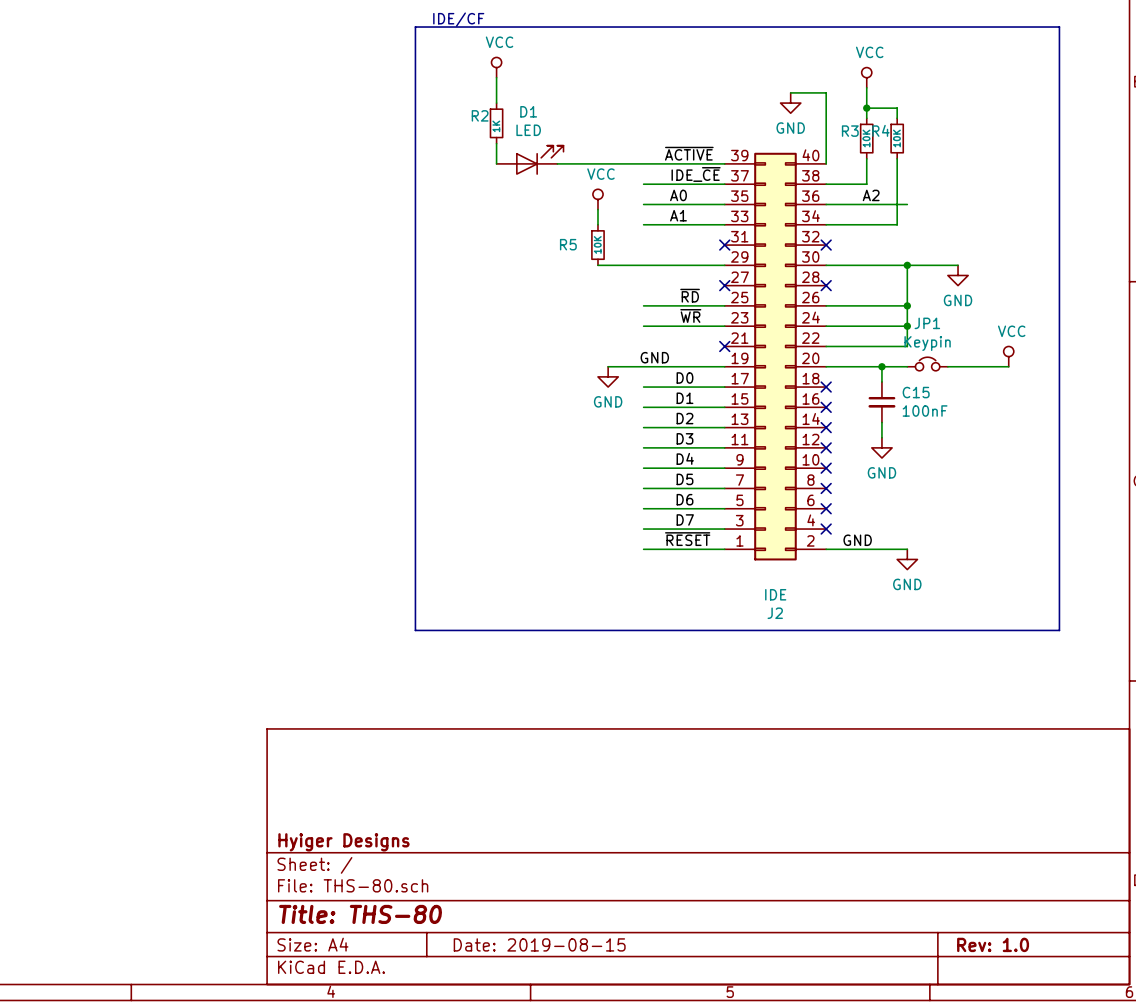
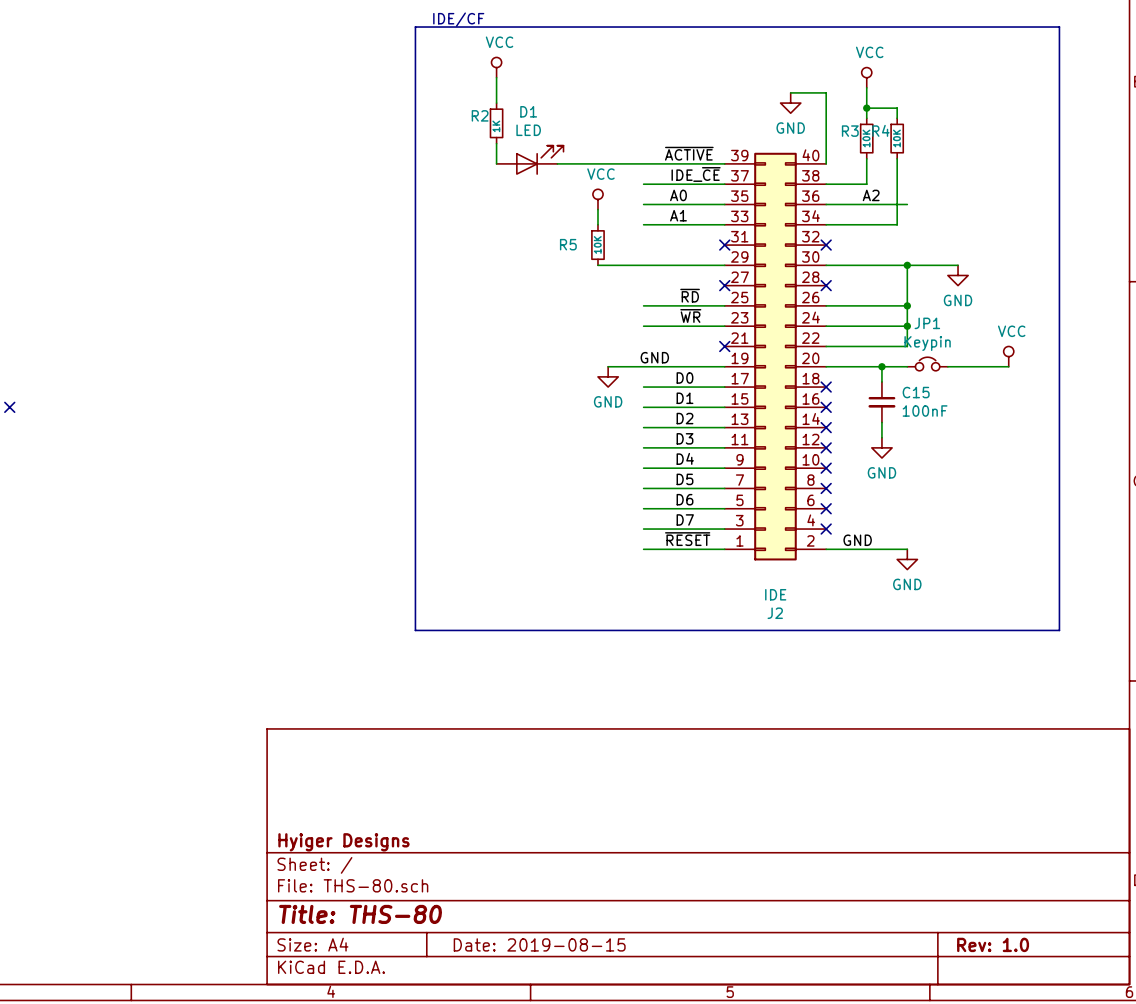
no-connect mark: none -> (9, 407)

